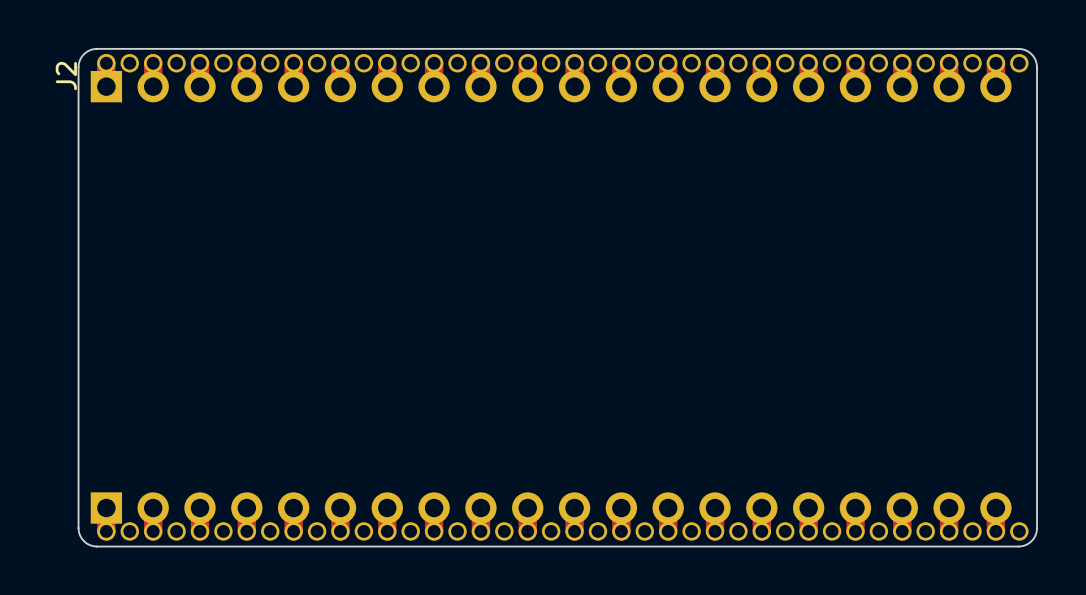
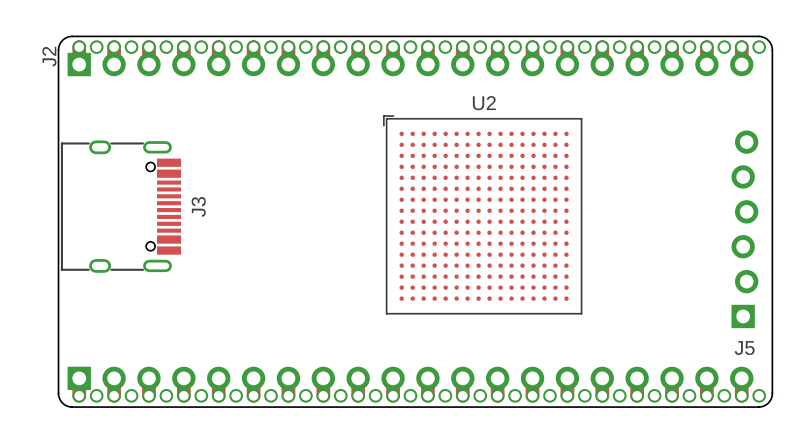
J3: none -> (120, 206)
U2: none -> (482, 214)
J5: none -> (744, 229)

